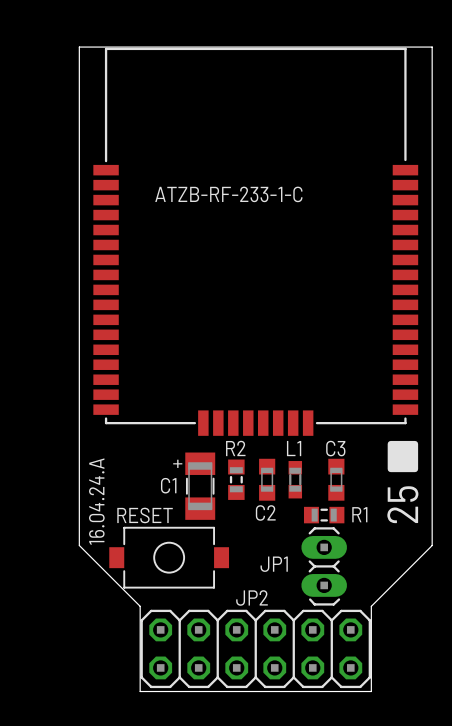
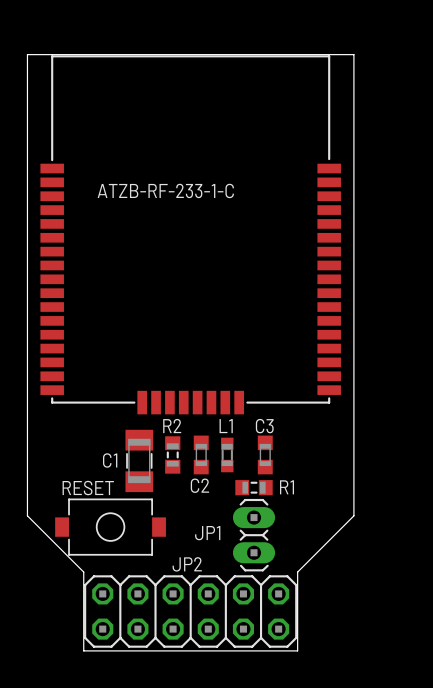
drawing: [387, 440, 419, 473] -> none
text: + (177, 463) -> none
text: 16.04.24.A (96, 501) -> none
text: 25 (402, 504) -> none

